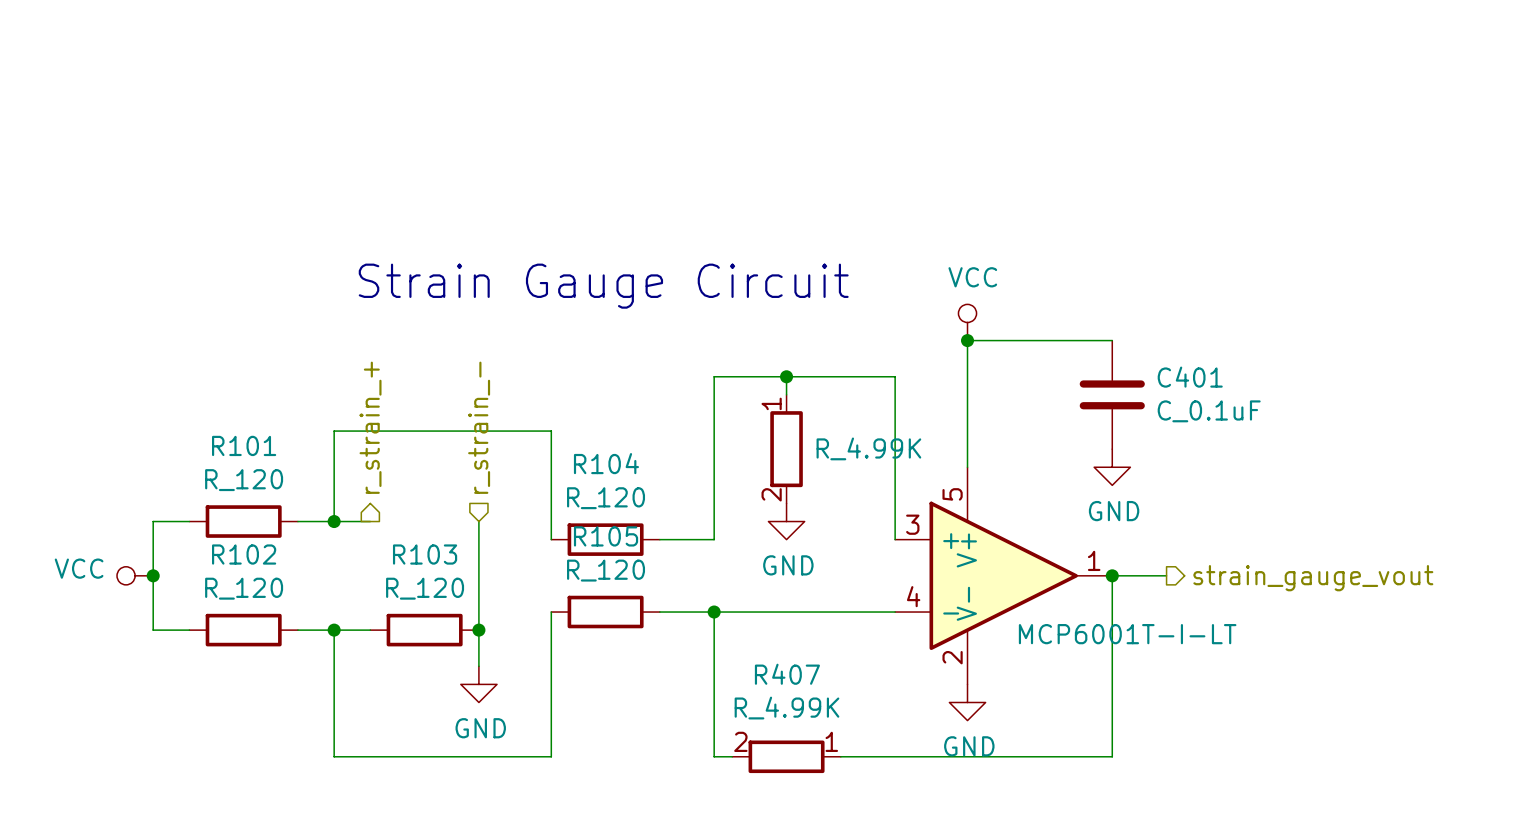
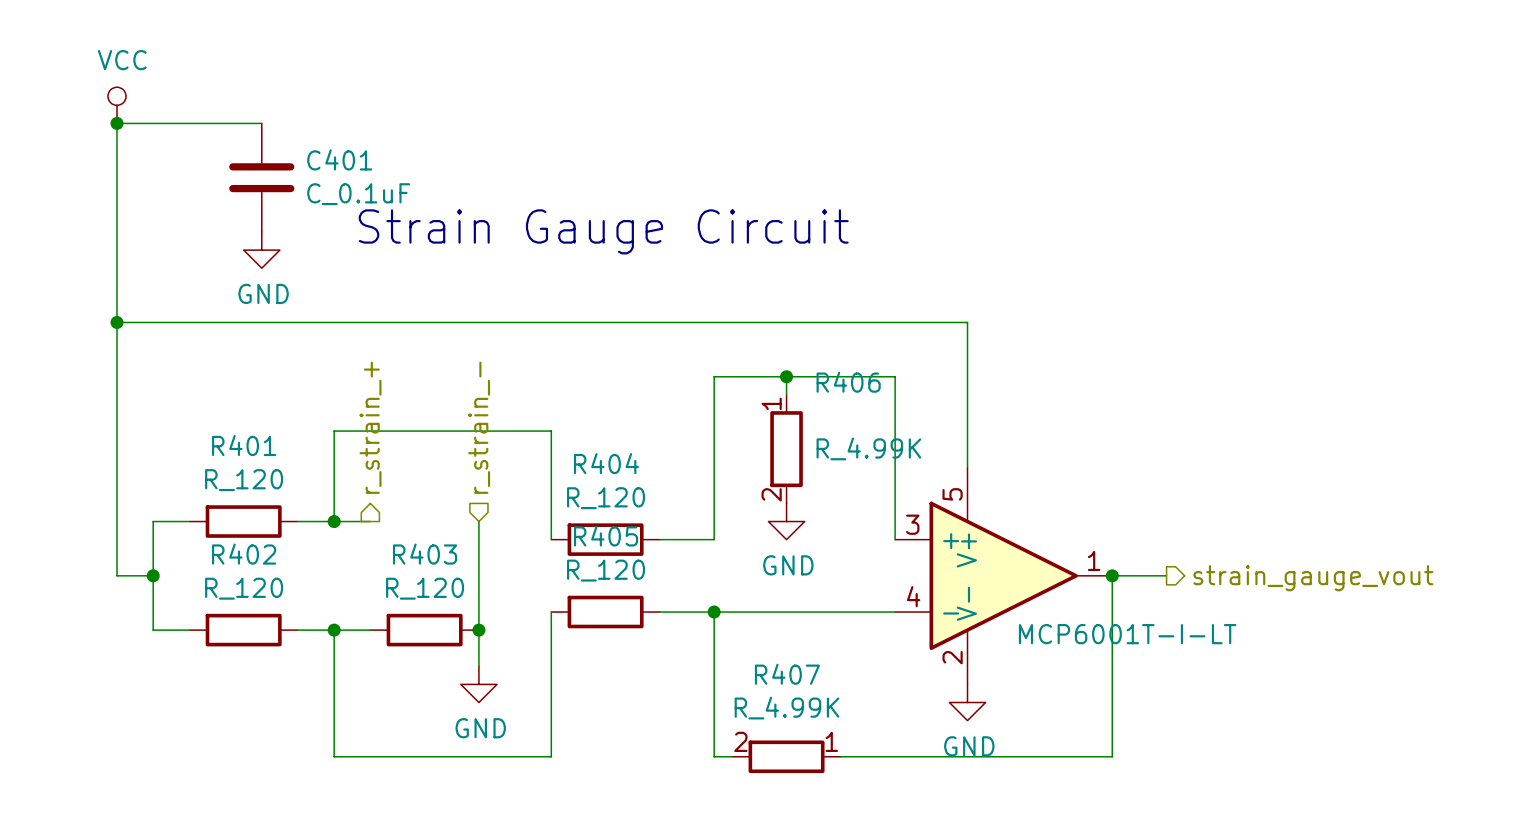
power symbol: none -> VCC (117, 105)
junction: none -> (117, 123)
wire: none -> (261, 123) (117, 123) (117, 575) (153, 575)
power symbol: none -> GND (261, 250)
text position: Strain Gauge Circuit (603, 286) -> Strain Gauge Circuit (603, 231)
junction: none -> (117, 322)
power symbol: VCC (967, 322) -> none
wire: (967, 340) (1112, 340) -> (967, 340) (967, 322) (117, 322)
junction: (967, 340) -> none
R406 name: none -> R406 (848, 382)
C401 position: (1112, 394) -> (261, 177)
R101 name: R101 (244, 445) -> R401 (244, 445)
R104 name: R104 (606, 463) -> R404 (606, 463)
power symbol: GND (1112, 467) -> none
R105 name: R105 (606, 536) -> R405 (606, 535)
R102 name: R102 (244, 554) -> R402 (244, 554)
R103 name: R103 (425, 554) -> R403 (425, 554)
power symbol: VCC (135, 575) -> none

